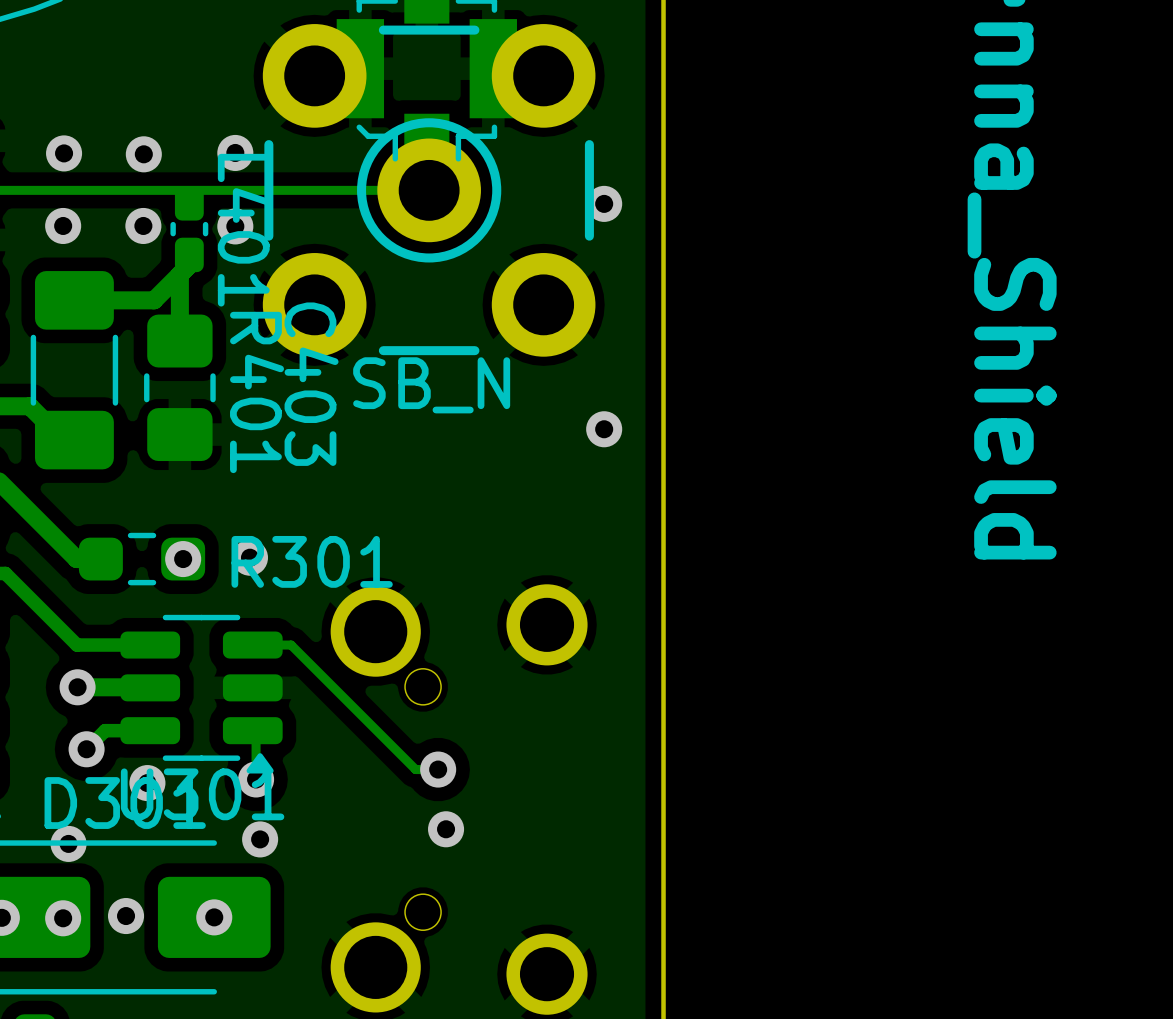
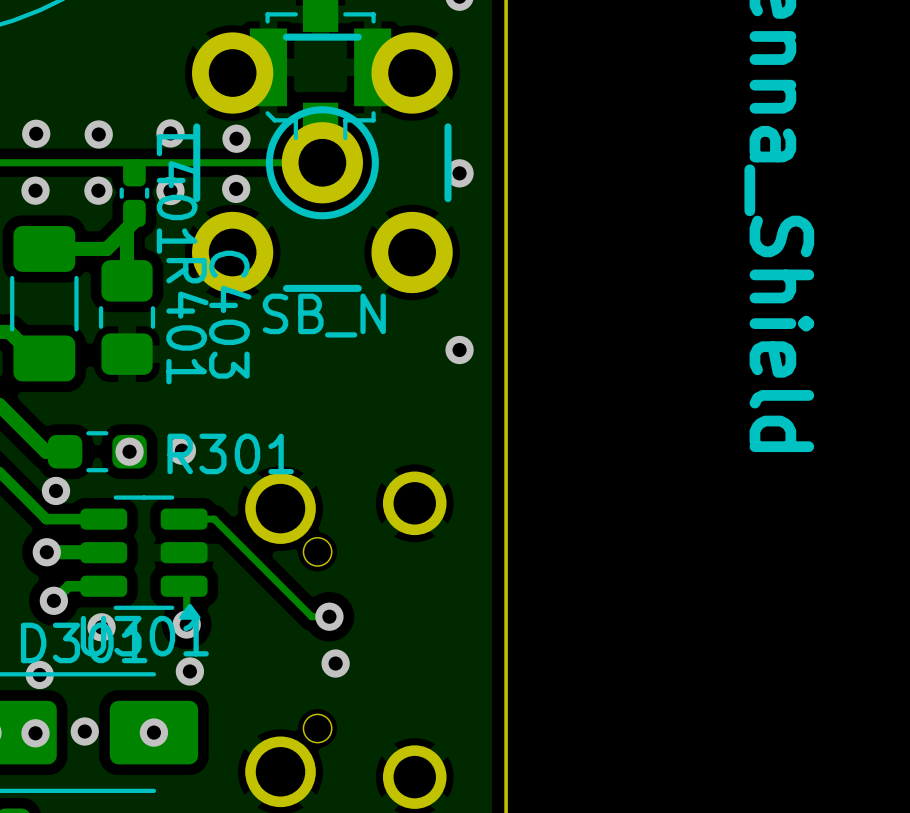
via: none -> (236, 138)
via: none -> (236, 188)
via: none -> (56, 490)

